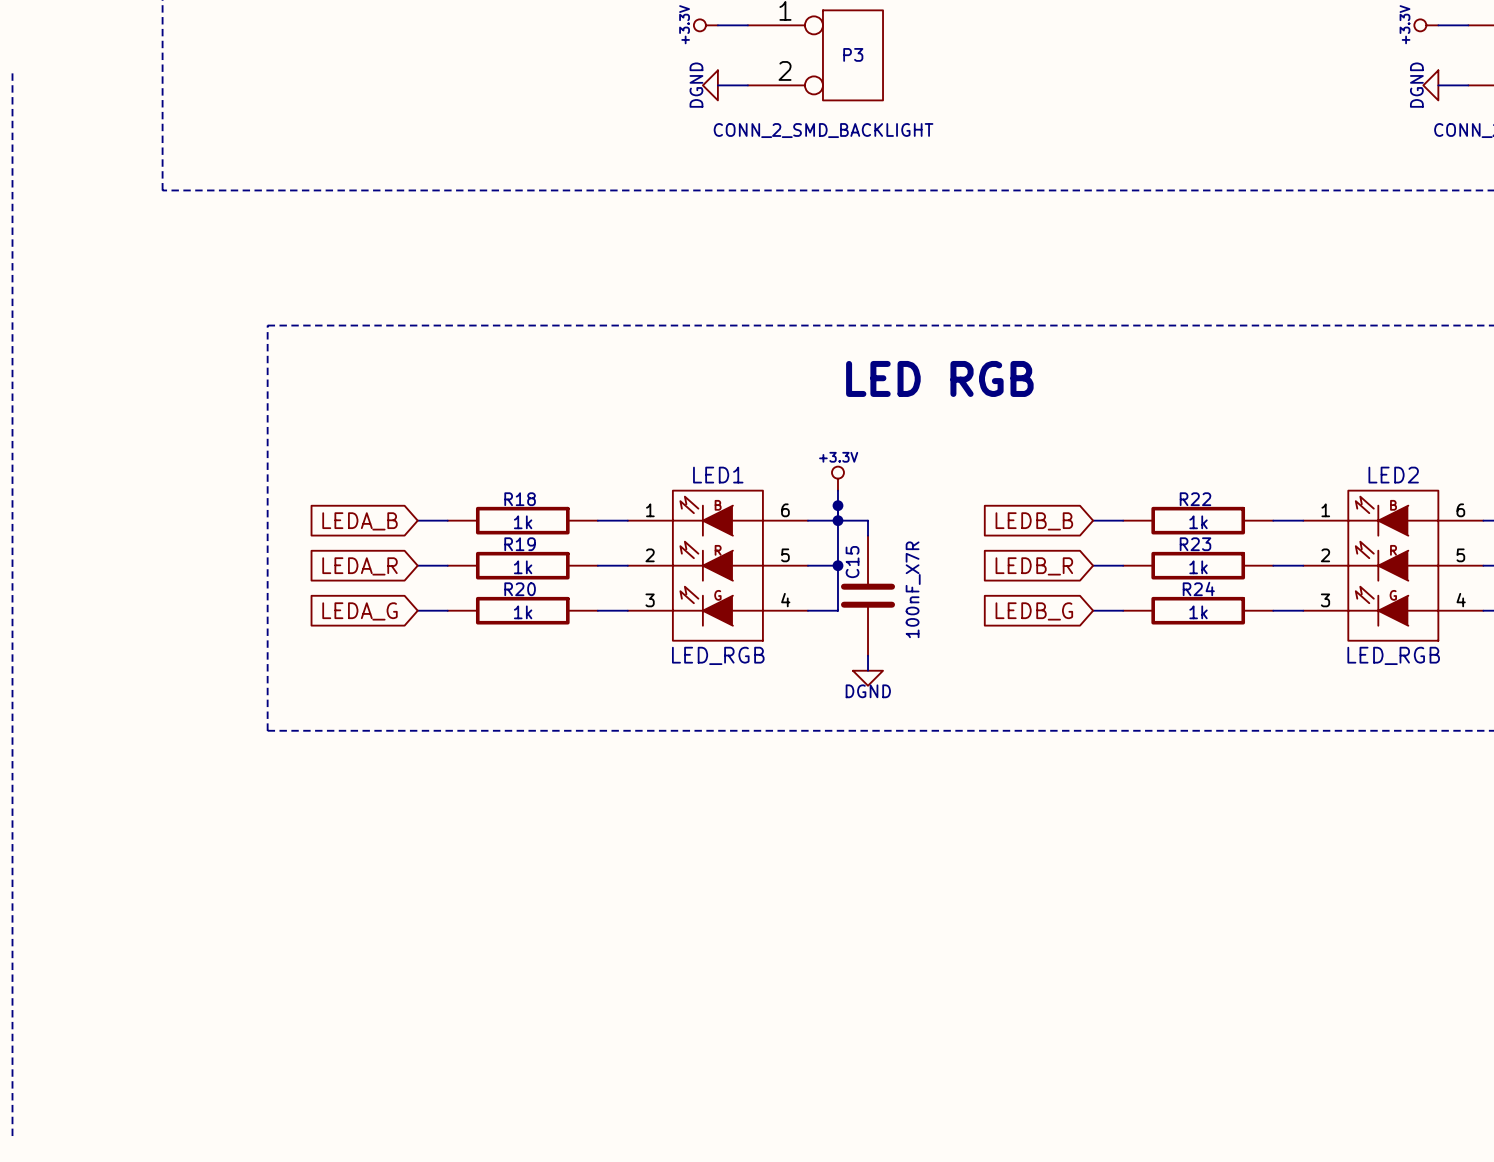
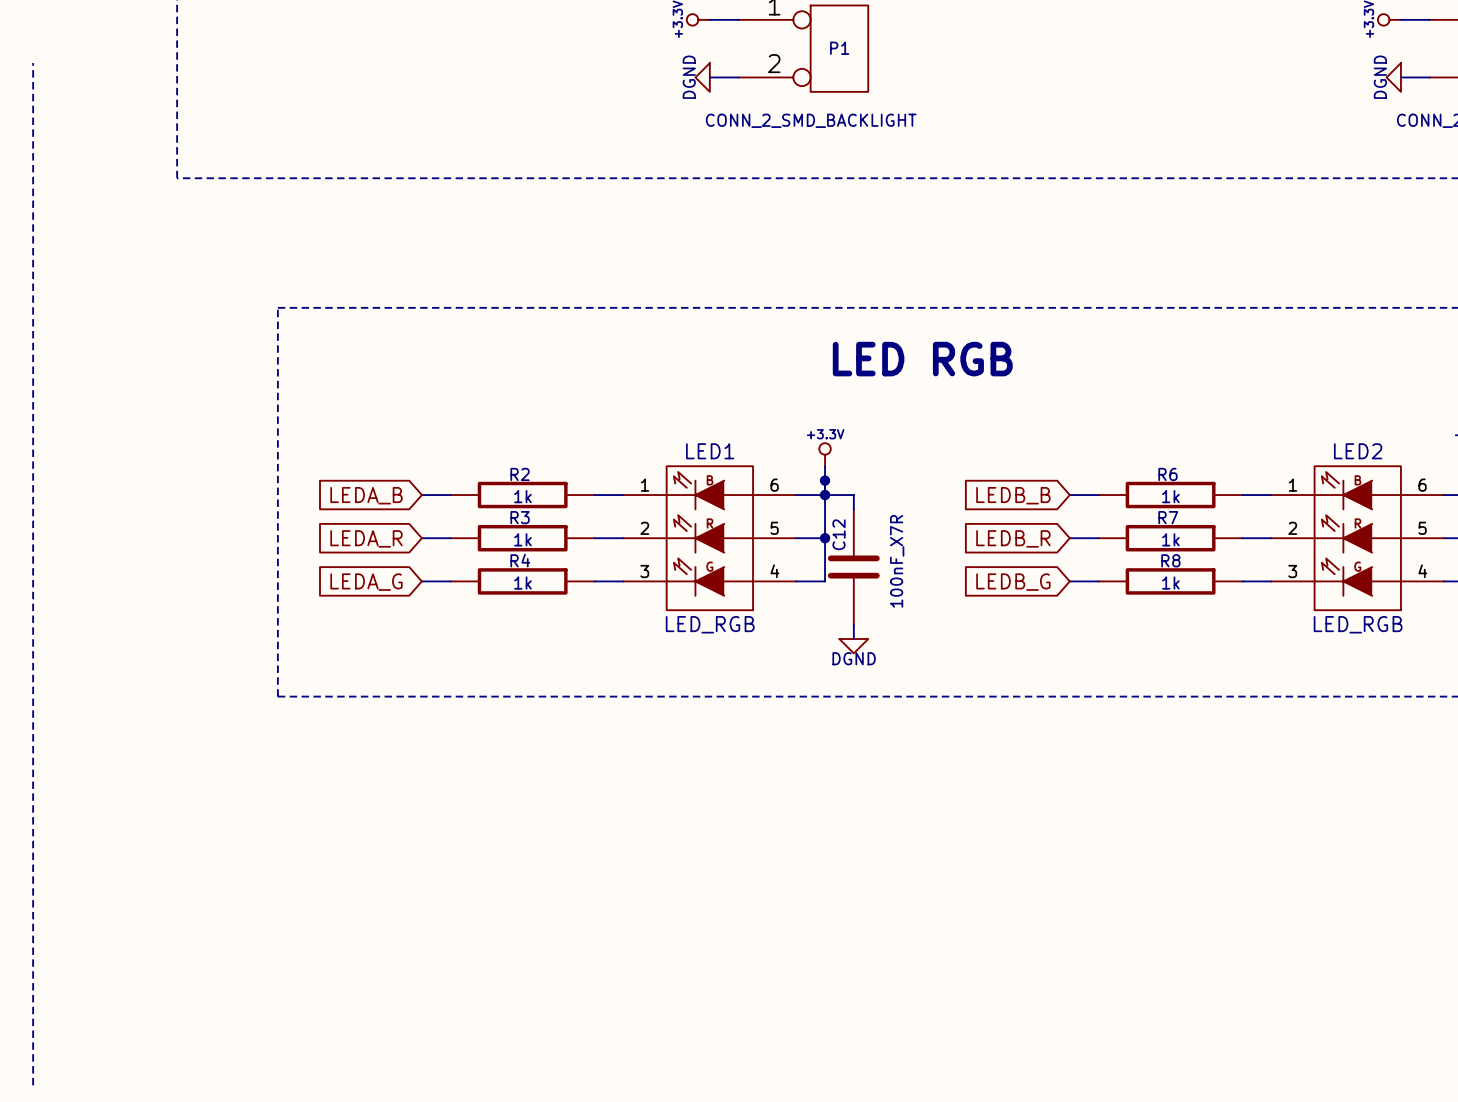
P3 name: P3 (853, 54) -> P1 (839, 48)
R18 name: R18 (520, 499) -> R2 (520, 474)
R22 name: R22 (1195, 499) -> R6 (1167, 474)
R19 name: R19 (520, 544) -> R3 (520, 517)
R23 name: R23 (1195, 544) -> R7 (1168, 517)
C15 name: C15 (852, 562) -> C12 (839, 534)
R24 name: R24 (1198, 588) -> R8 (1170, 560)
R20 name: R20 (520, 589) -> R4 (520, 560)

